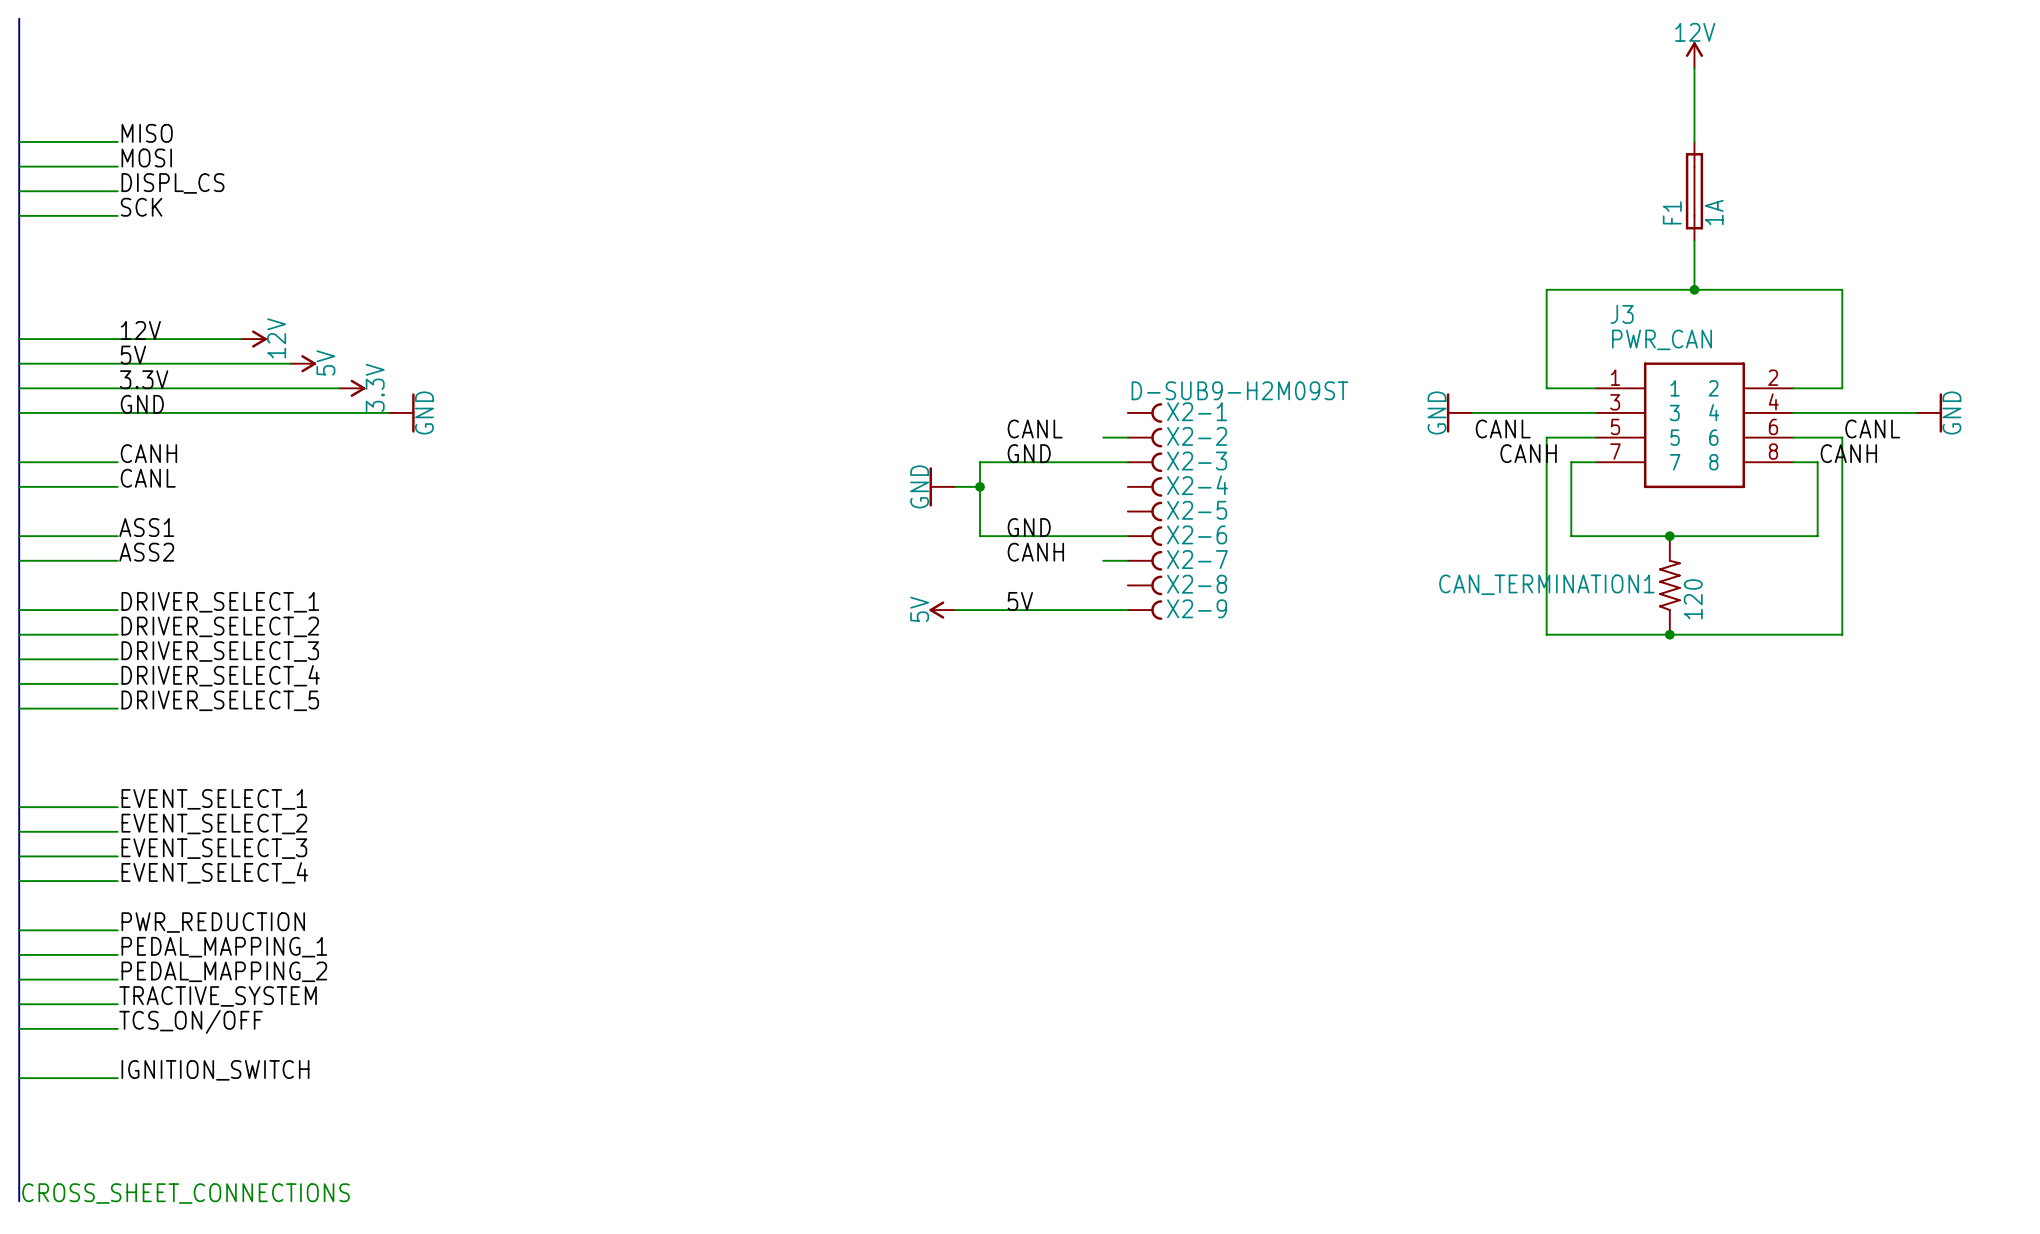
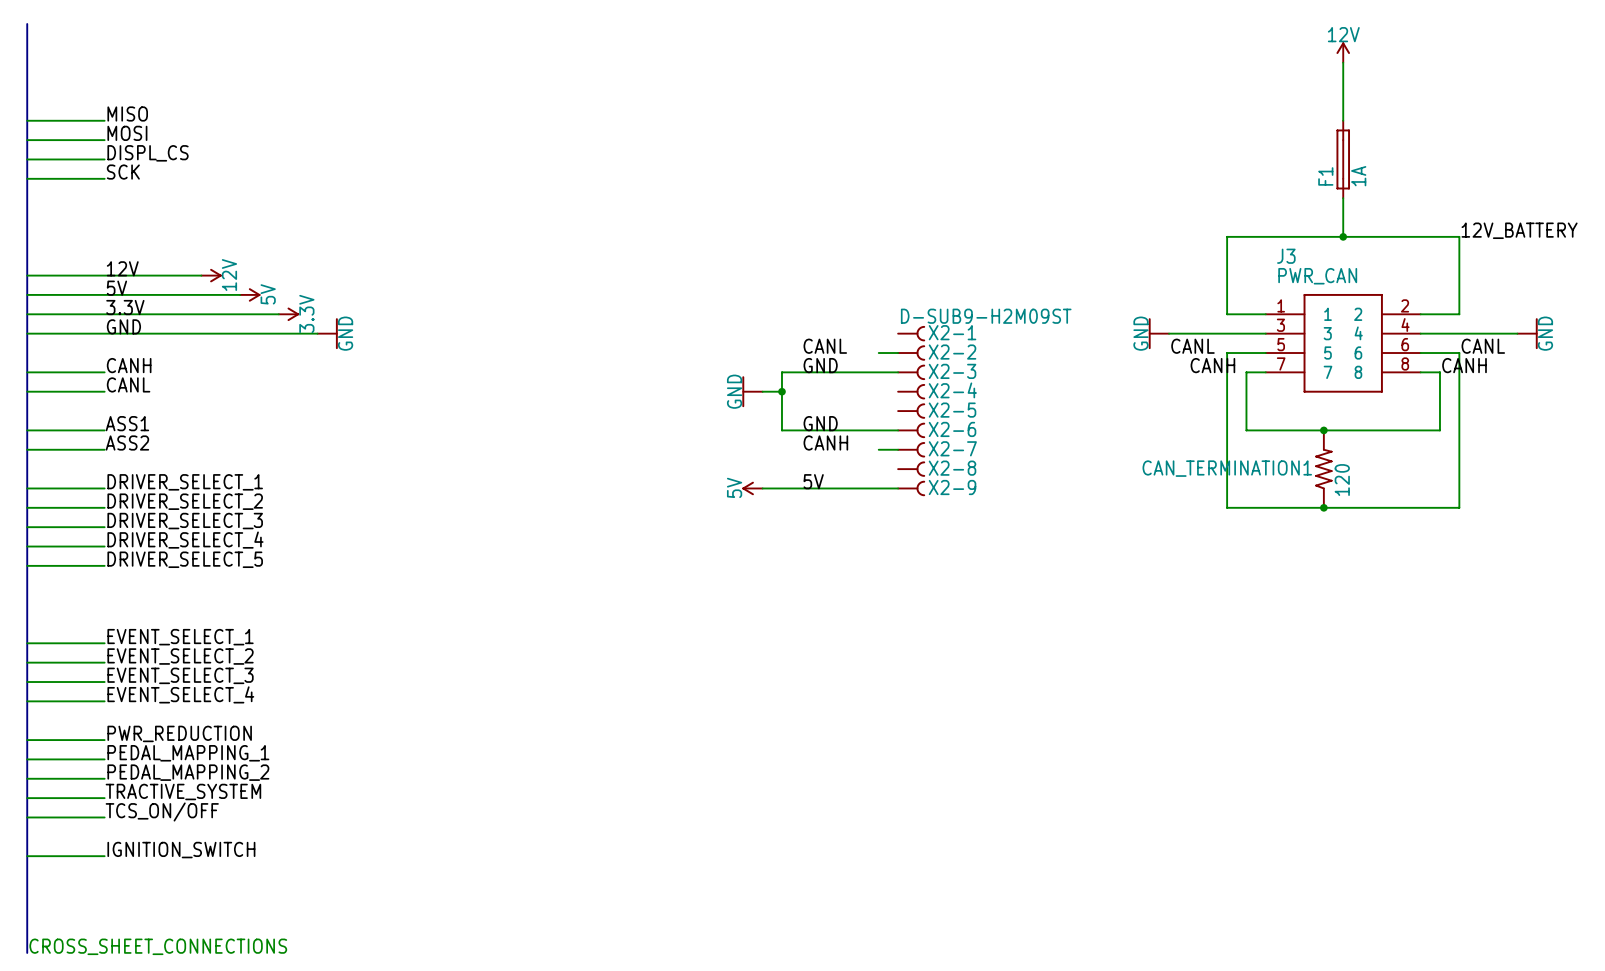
label: none -> 12V_BATTERY (1519, 230)

